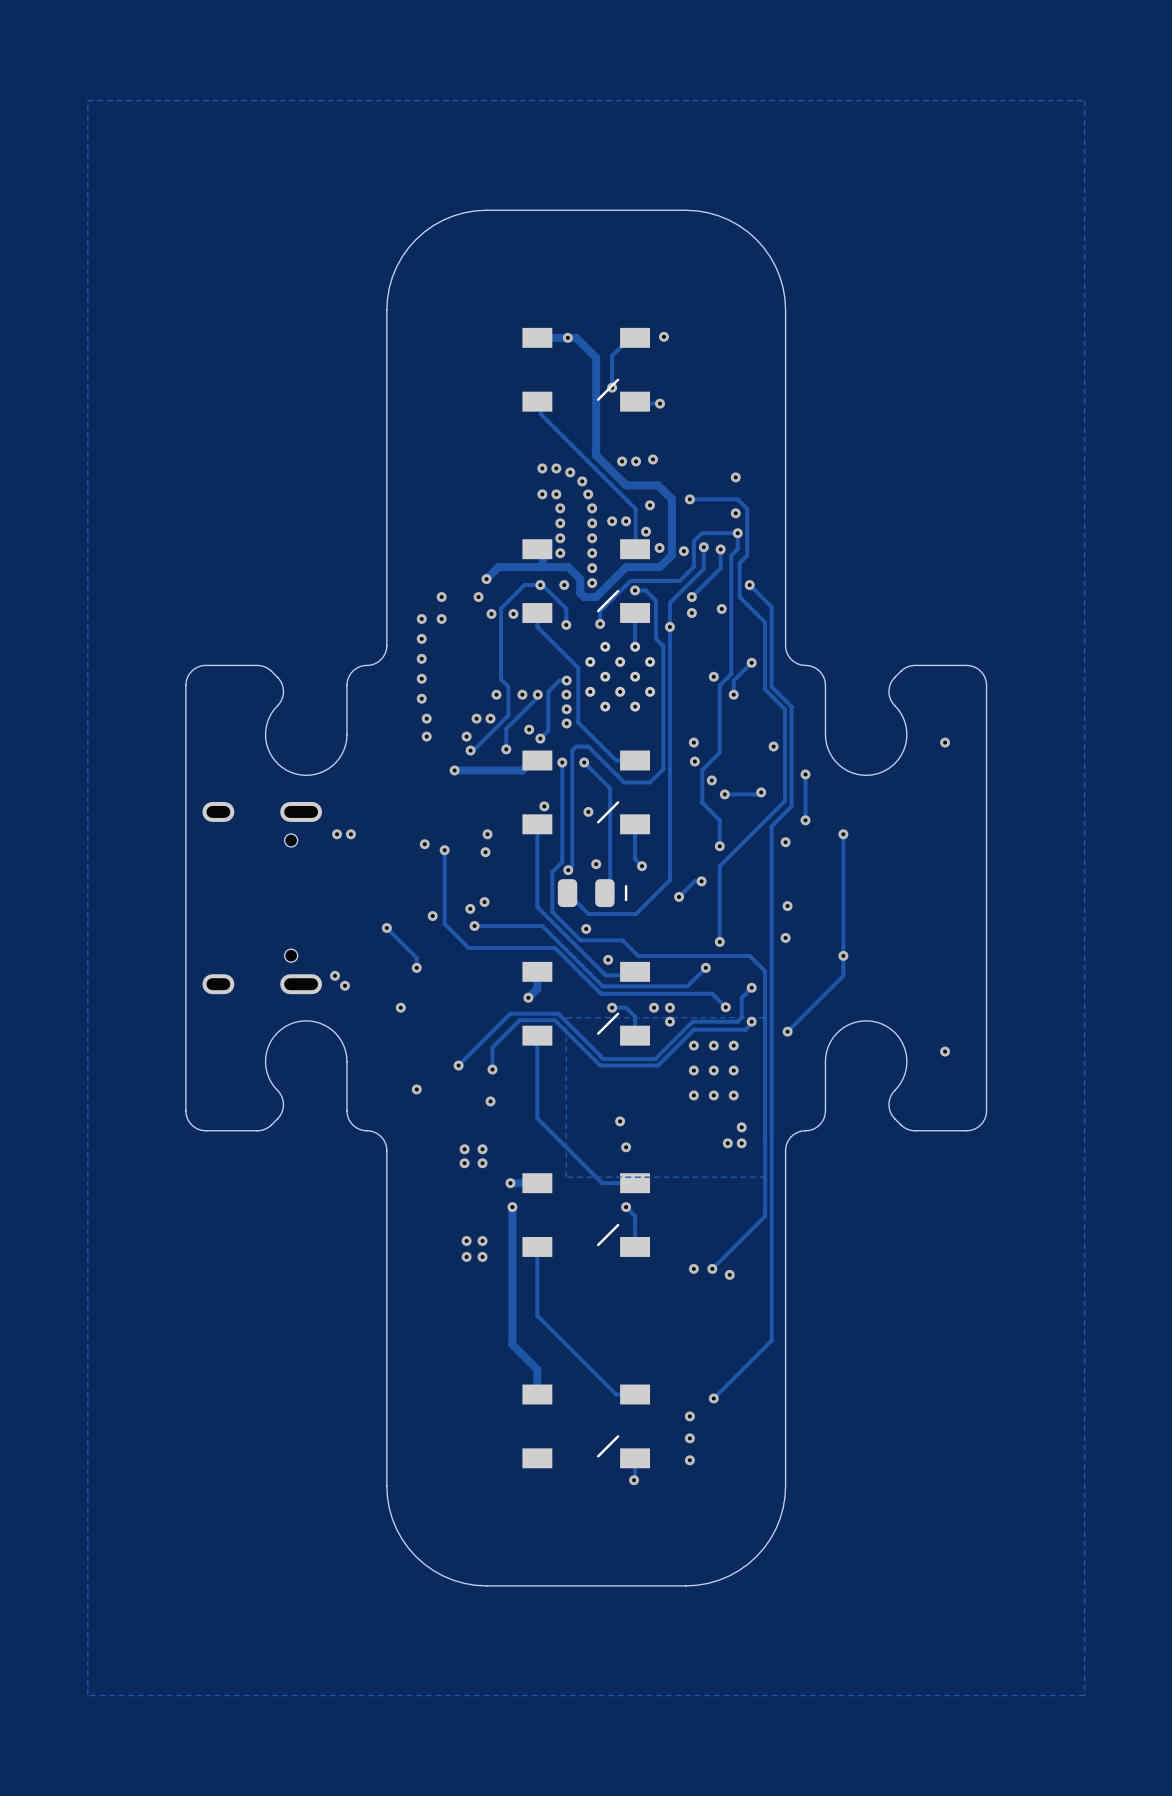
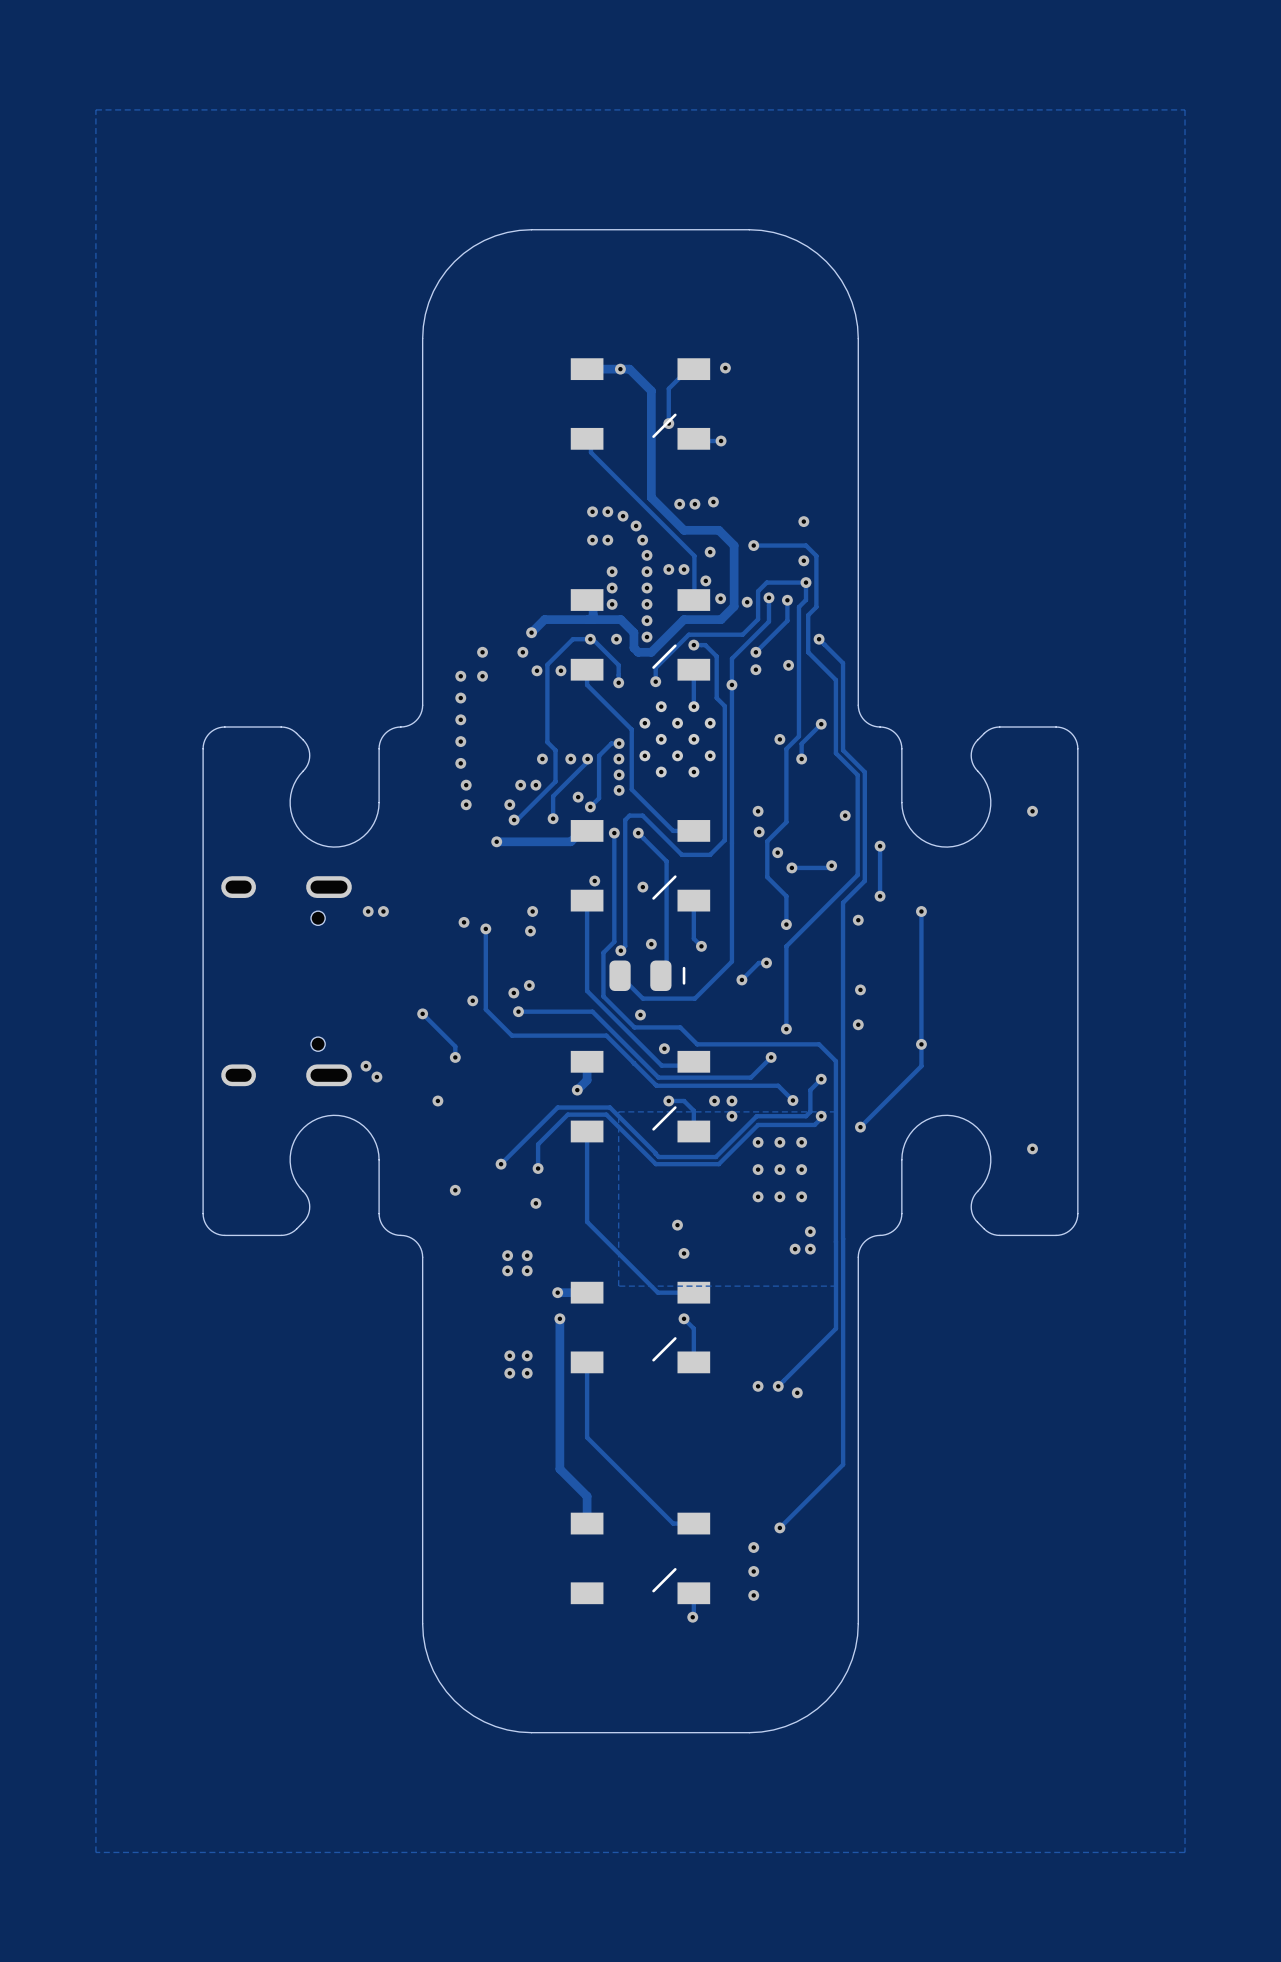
via: (560, 508) -> none

